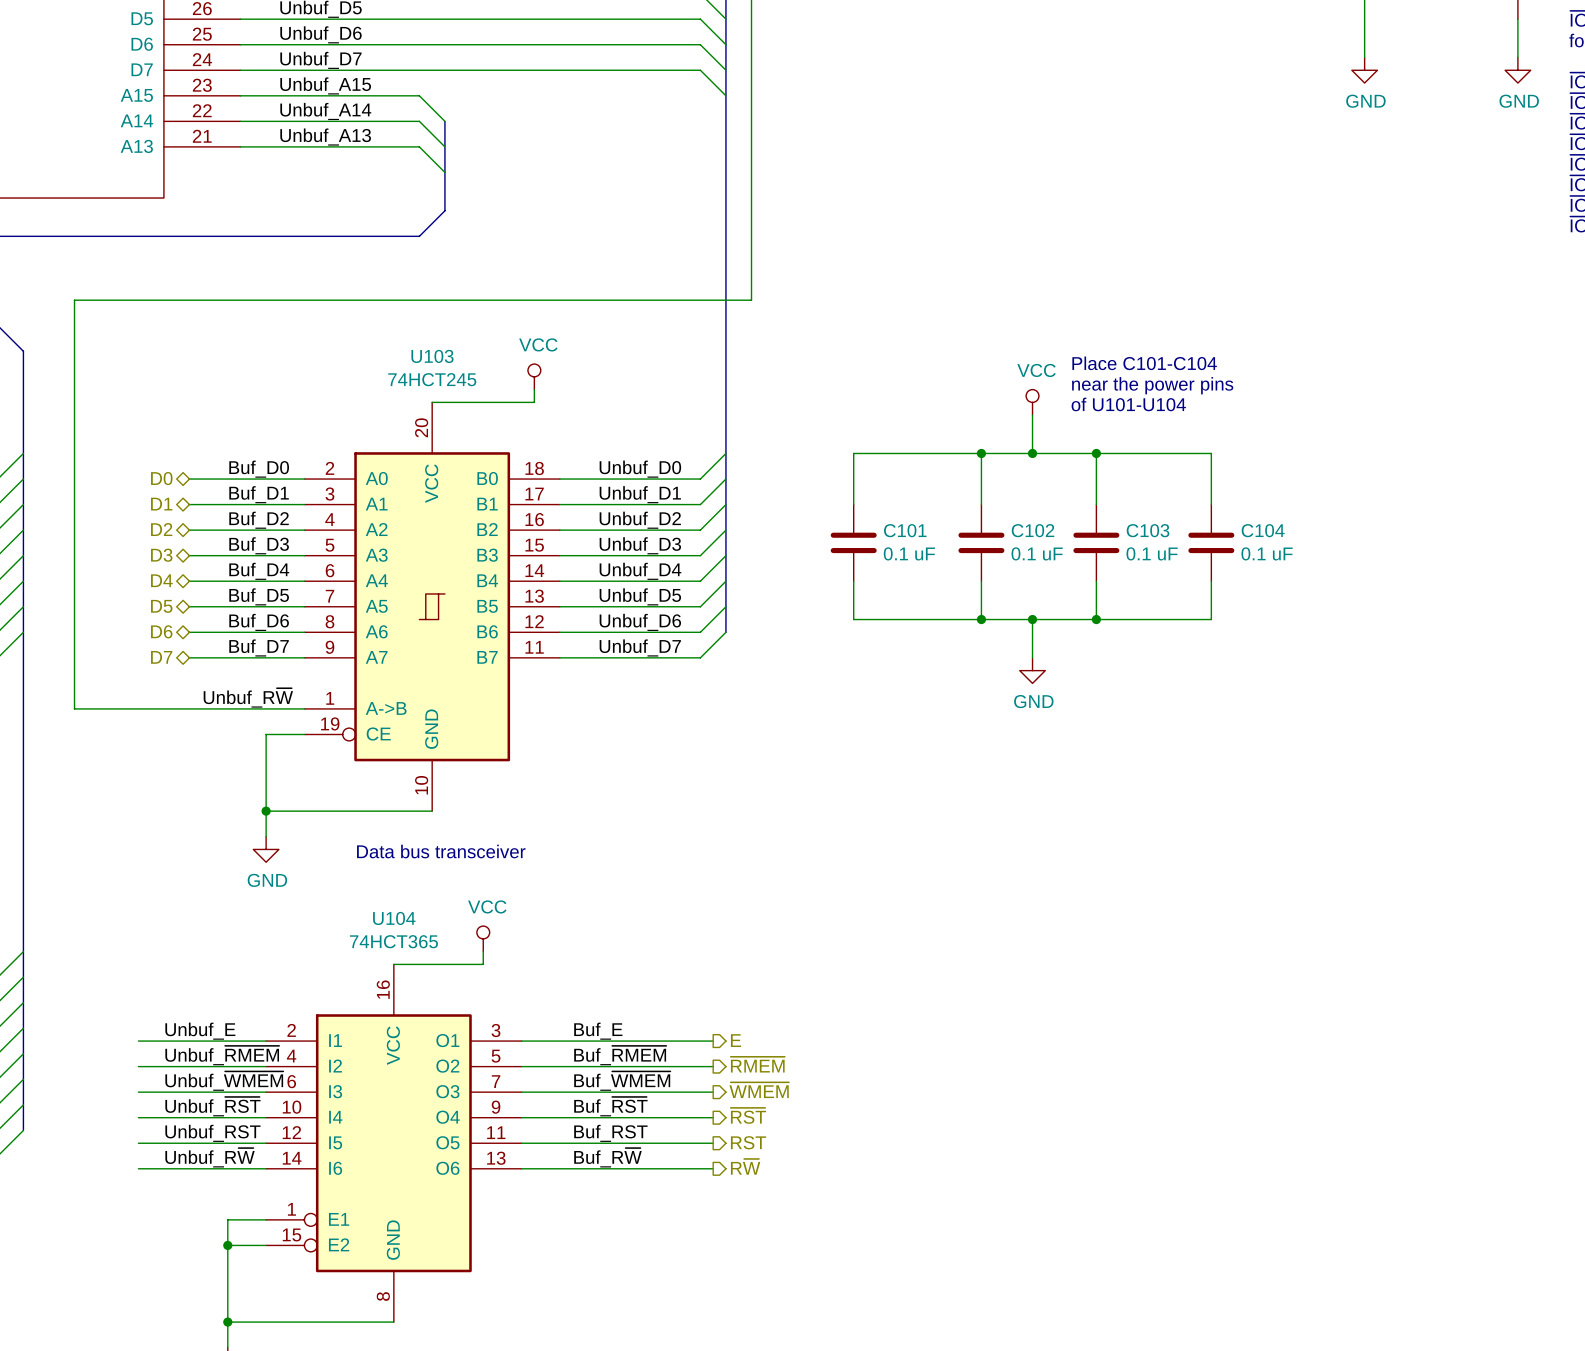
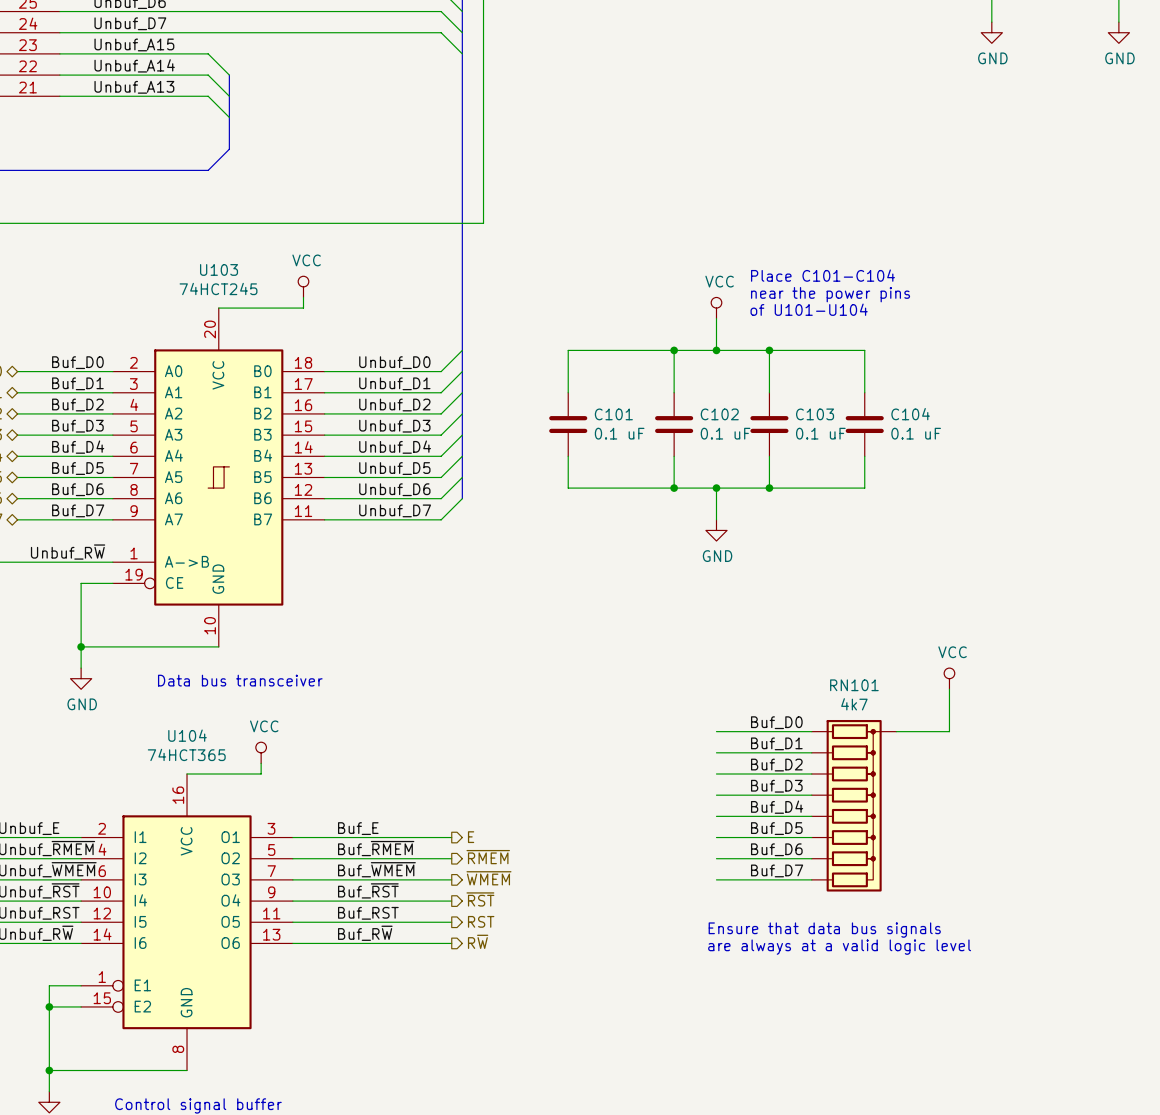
power symbol: none -> VCC (949, 678)
wire: none -> (949, 689) (949, 731) (896, 731)
label: none -> Buf_D0 (776, 722)
wire: none -> (716, 731) (811, 731)
label: none -> Buf_D1 (776, 743)
wire: none -> (716, 752) (811, 752)
label: none -> Buf_D2 (776, 765)
wire: none -> (716, 774) (811, 774)
label: none -> Buf_D3 (776, 786)
wire: none -> (716, 795) (811, 795)
RN101: none -> 4k7 (854, 805)
label: none -> Buf_D4 (777, 807)
wire: none -> (716, 816) (811, 816)
label: none -> Buf_D5 (776, 828)
wire: none -> (716, 837) (811, 837)
label: none -> Buf_D6 (776, 849)
wire: none -> (716, 858) (811, 858)
label: none -> Buf_D7 (777, 870)
wire: none -> (716, 879) (811, 879)
text: none -> Ensure that data bus signals (824, 930)
text: none -> are always at a valid logic level (839, 947)

